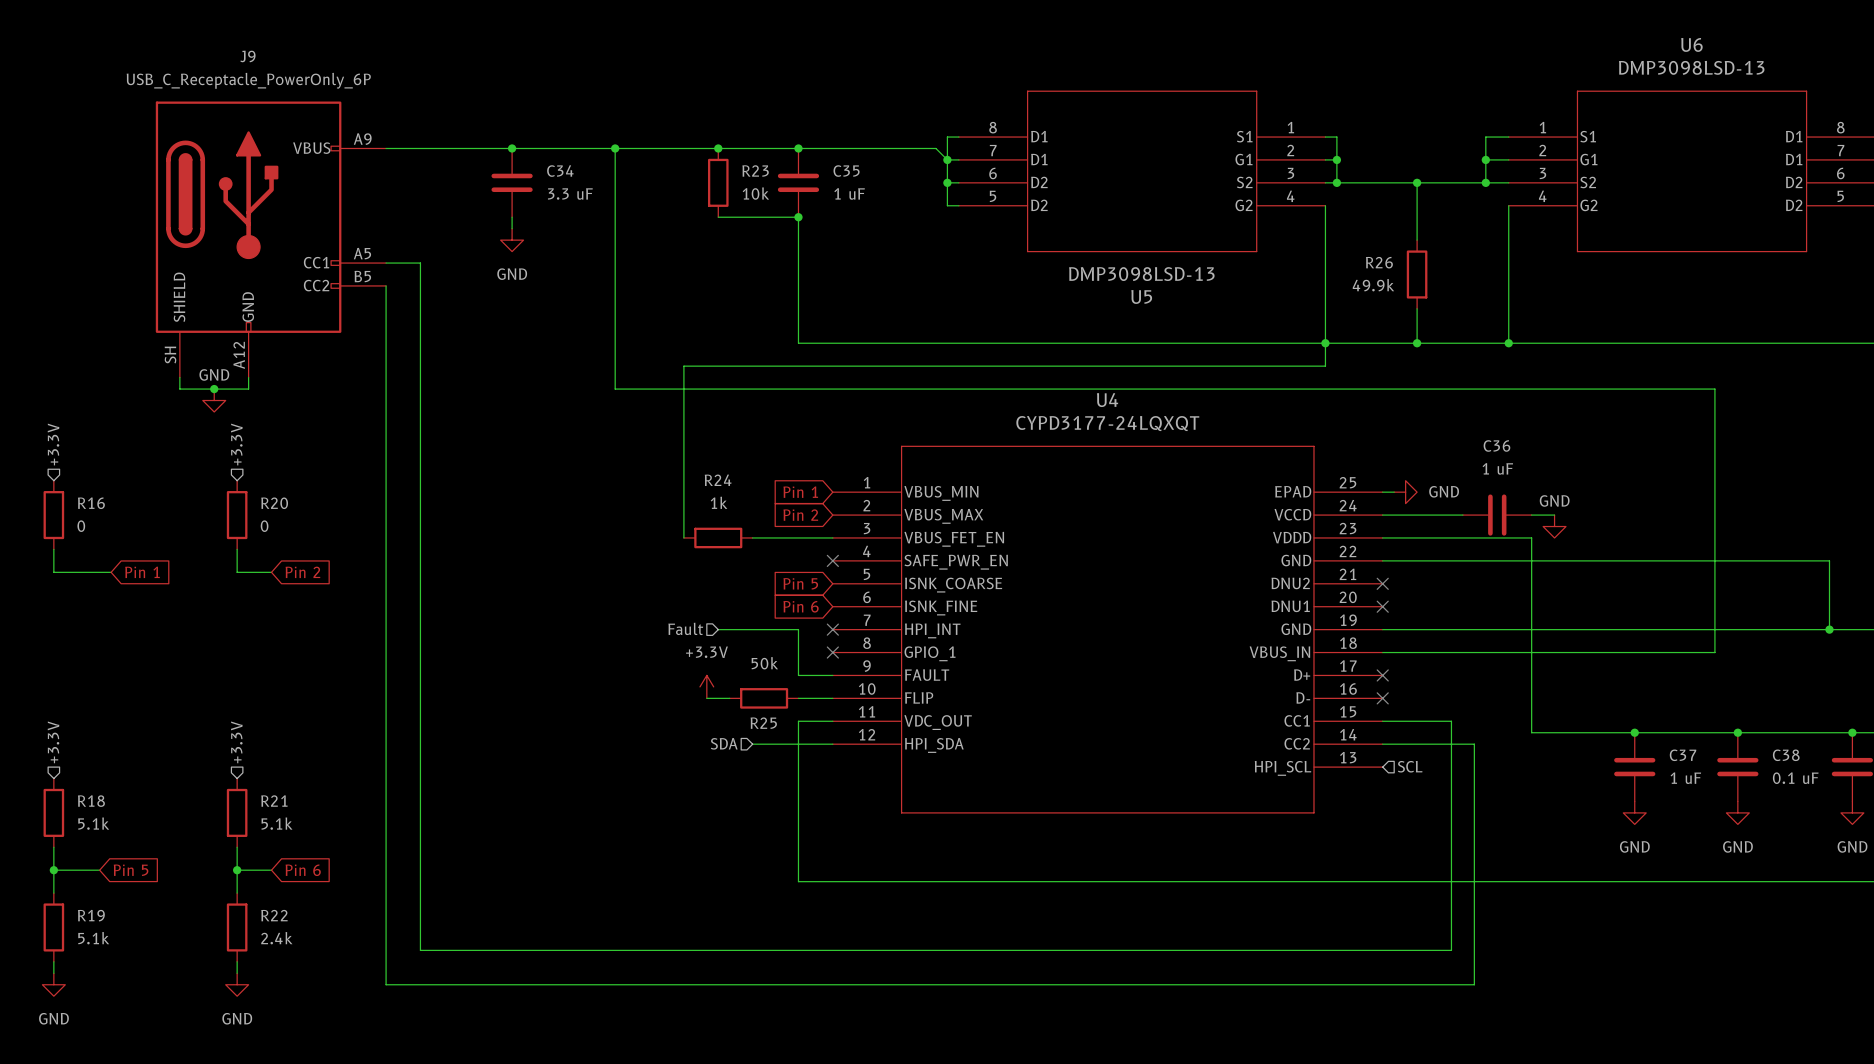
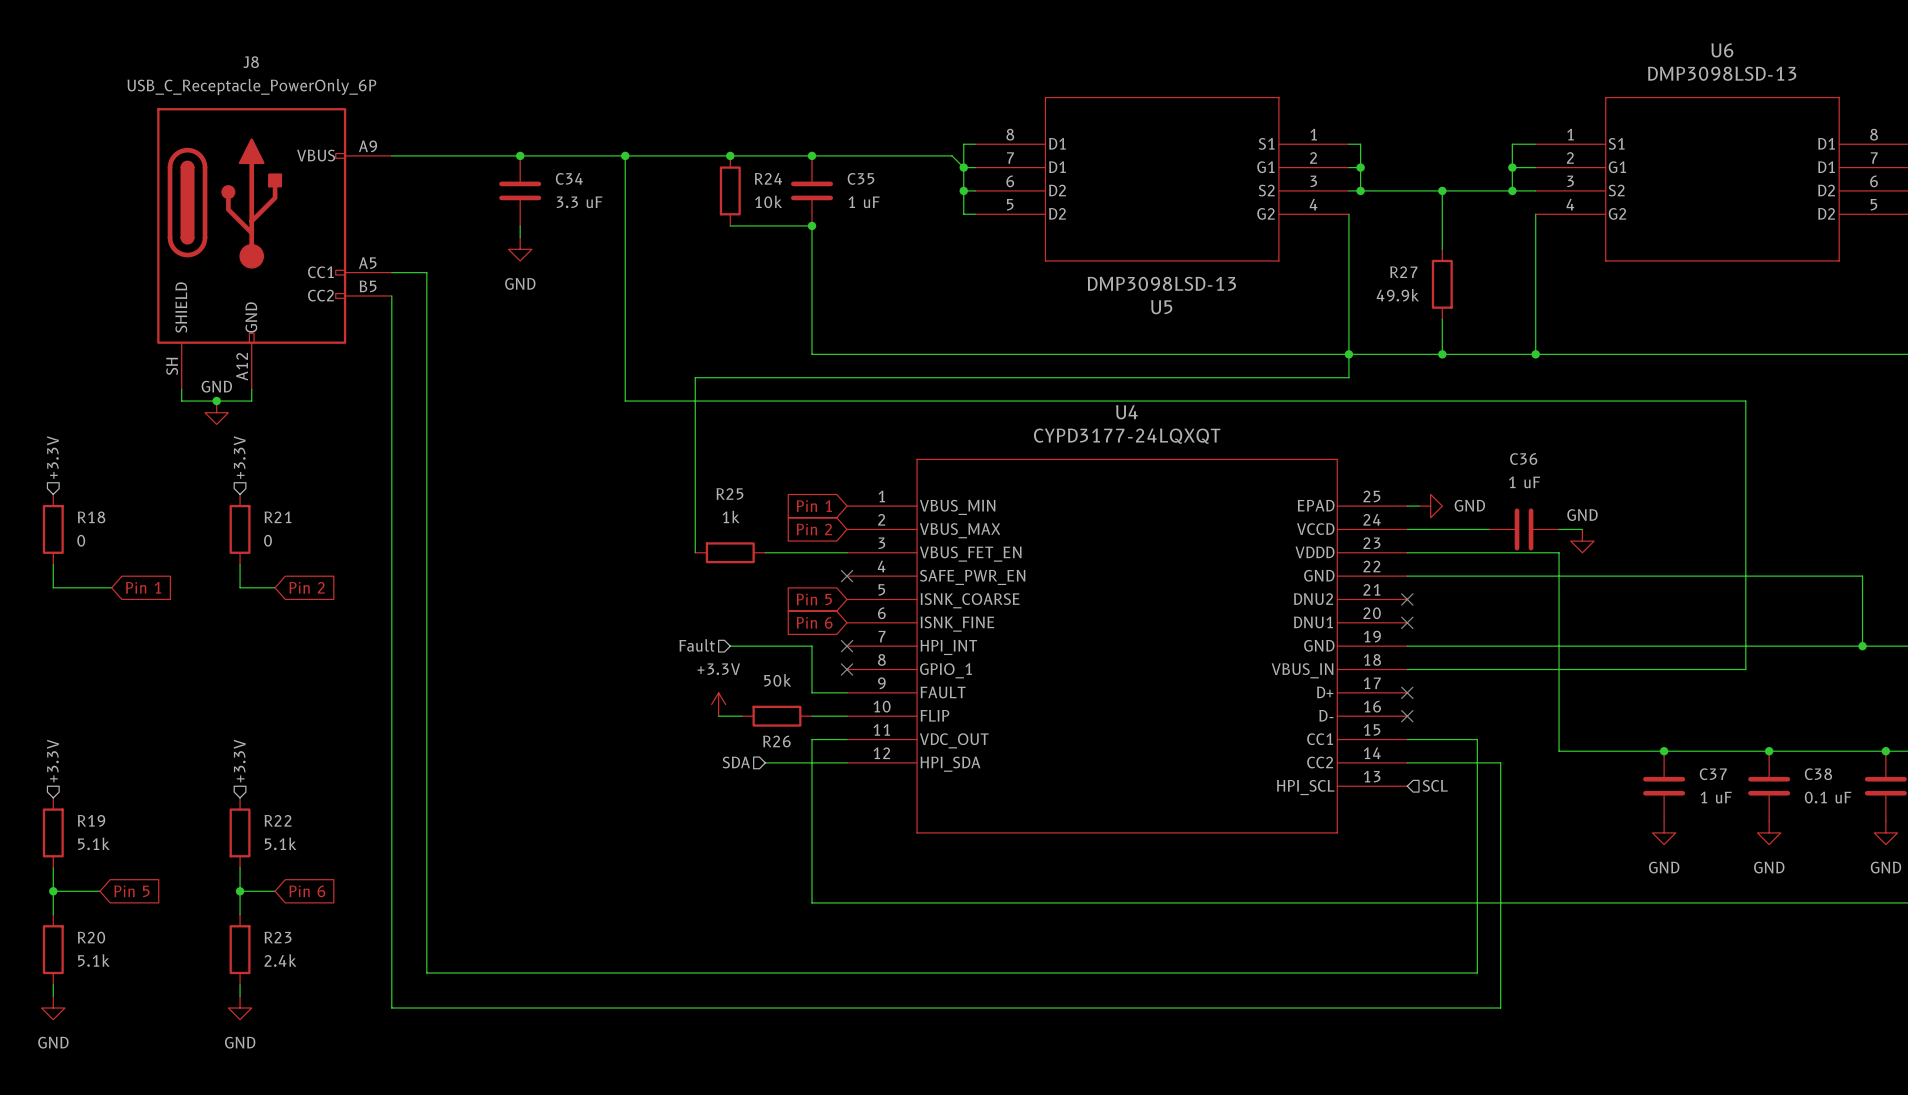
J9 name: J9 (247, 56) -> J8 (251, 62)
R23 name: R23 (755, 170) -> R24 (768, 178)
R26 name: R26 (1379, 262) -> R27 (1403, 272)
R24 name: R24 (718, 480) -> R25 (729, 493)
R16 name: R16 (91, 503) -> R18 (91, 517)
R20 name: R20 (274, 503) -> R21 (278, 517)
R25 name: R25 (763, 723) -> R26 (776, 741)
R18 name: R18 (91, 801) -> R19 (91, 820)
R21 name: R21 (274, 801) -> R22 (278, 820)
R19 name: R19 (91, 915) -> R20 (91, 937)
R22 name: R22 (274, 915) -> R23 (278, 937)

